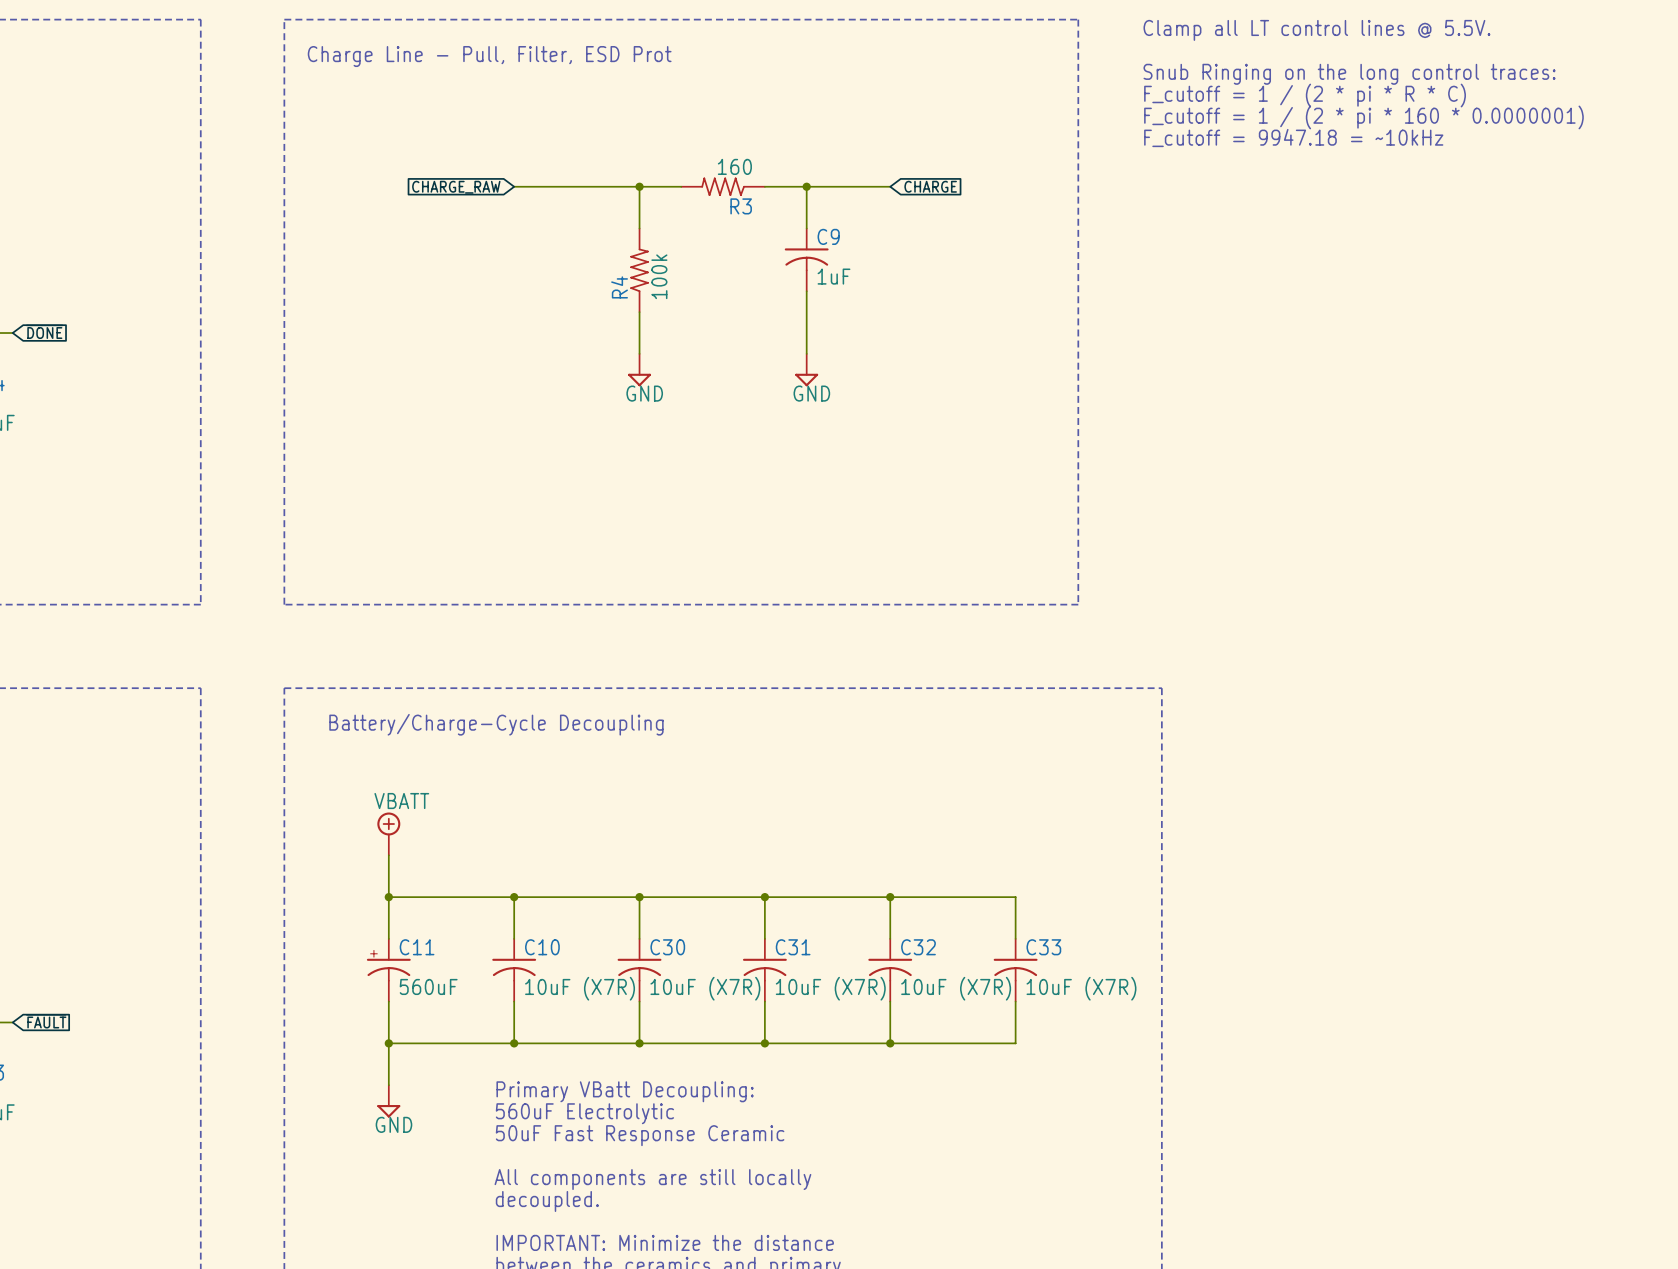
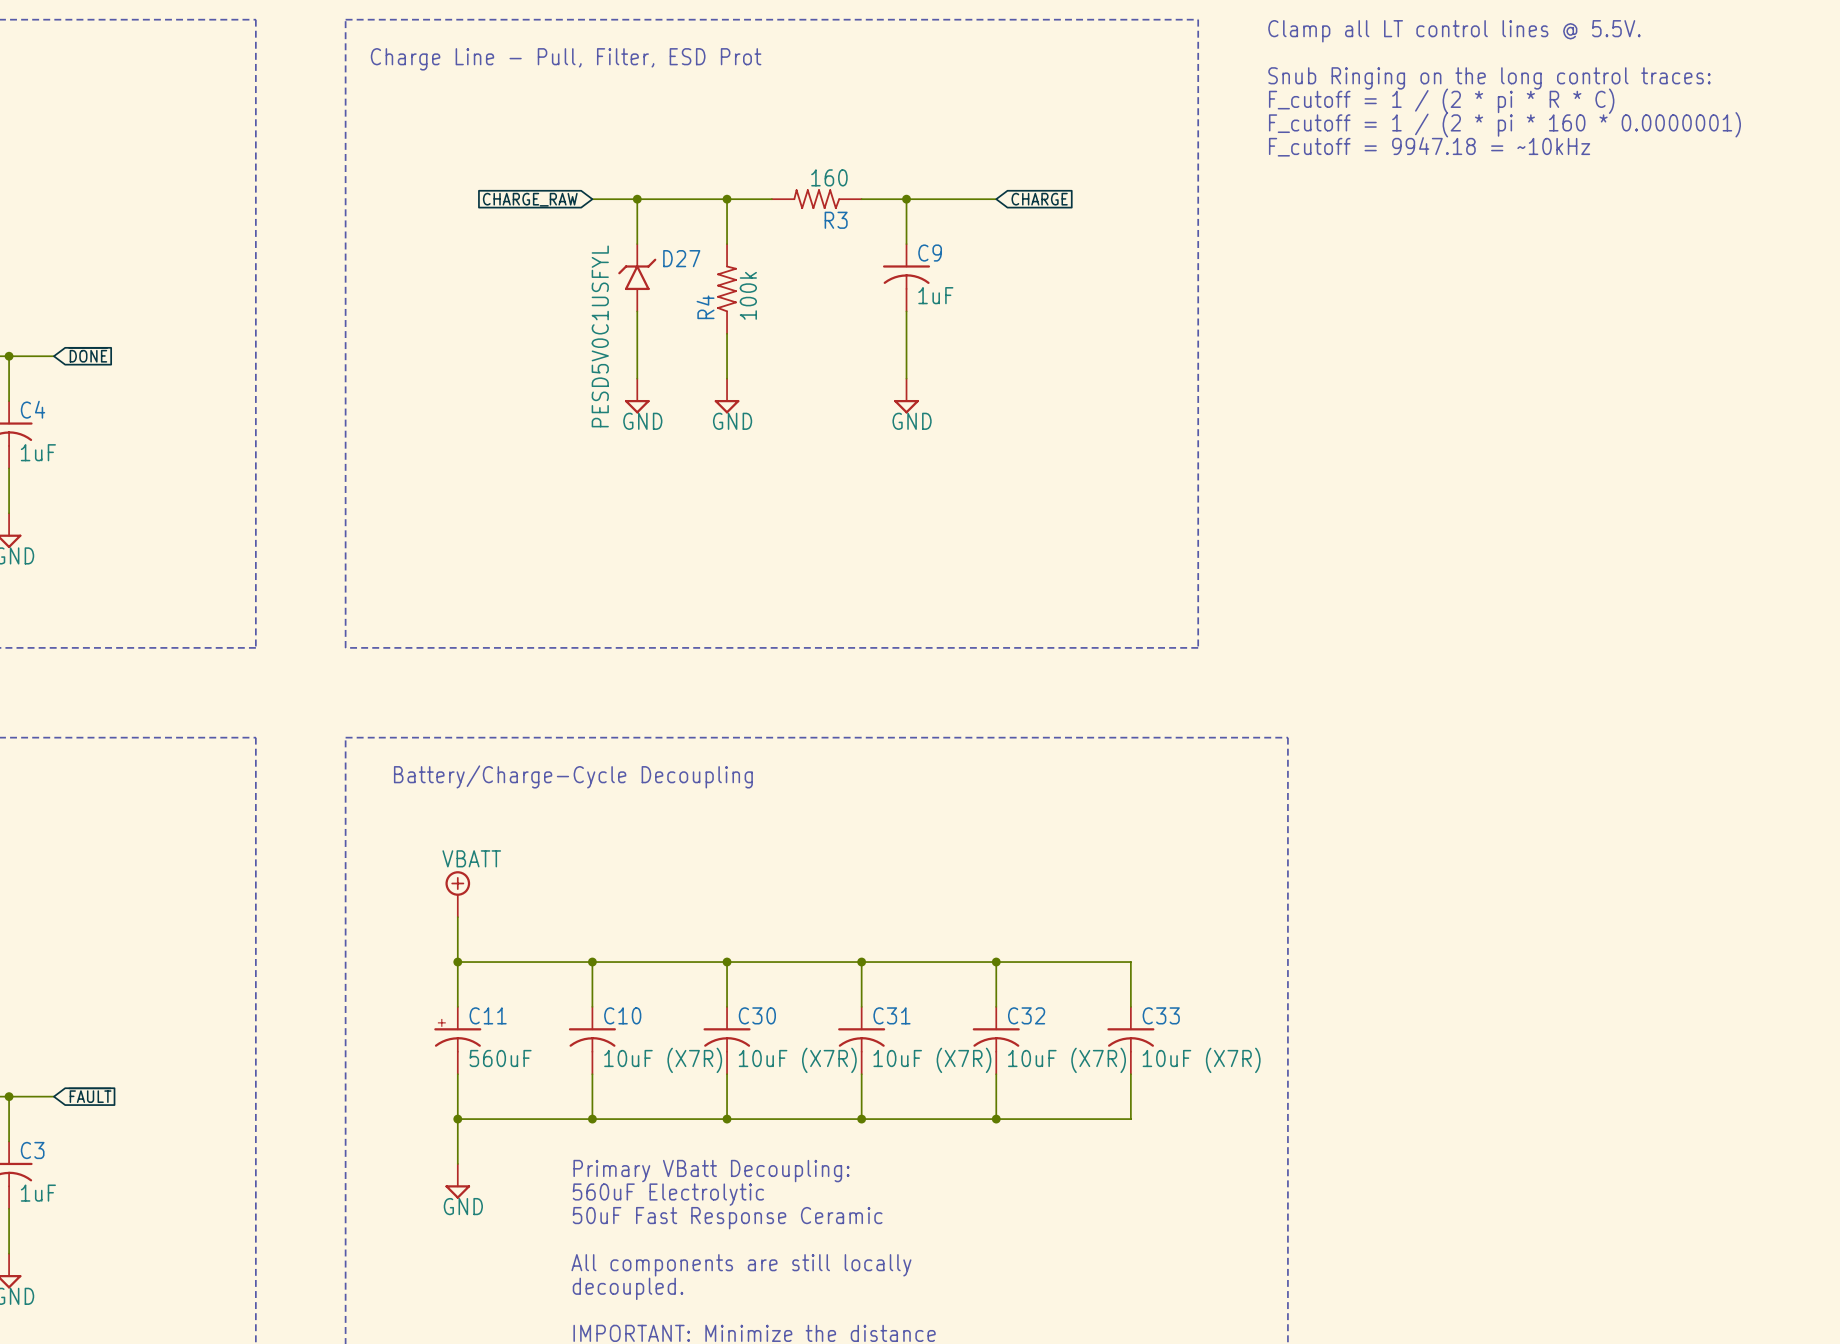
wire: none -> (637, 199) (637, 244)
junction: none -> (637, 199)
D27: none -> PESD5V0C1USFYL (637, 277)
wire: none -> (637, 311) (637, 378)
power symbol: none -> GND (637, 396)

